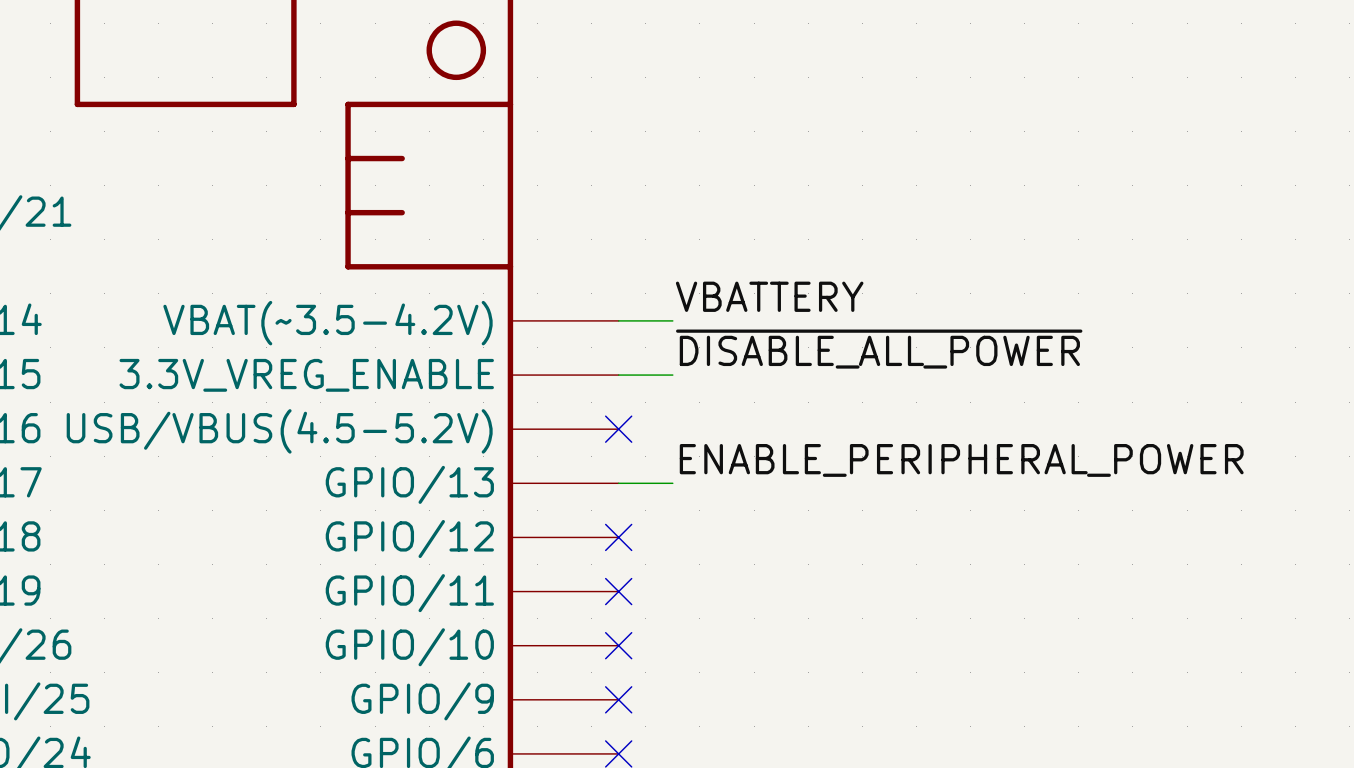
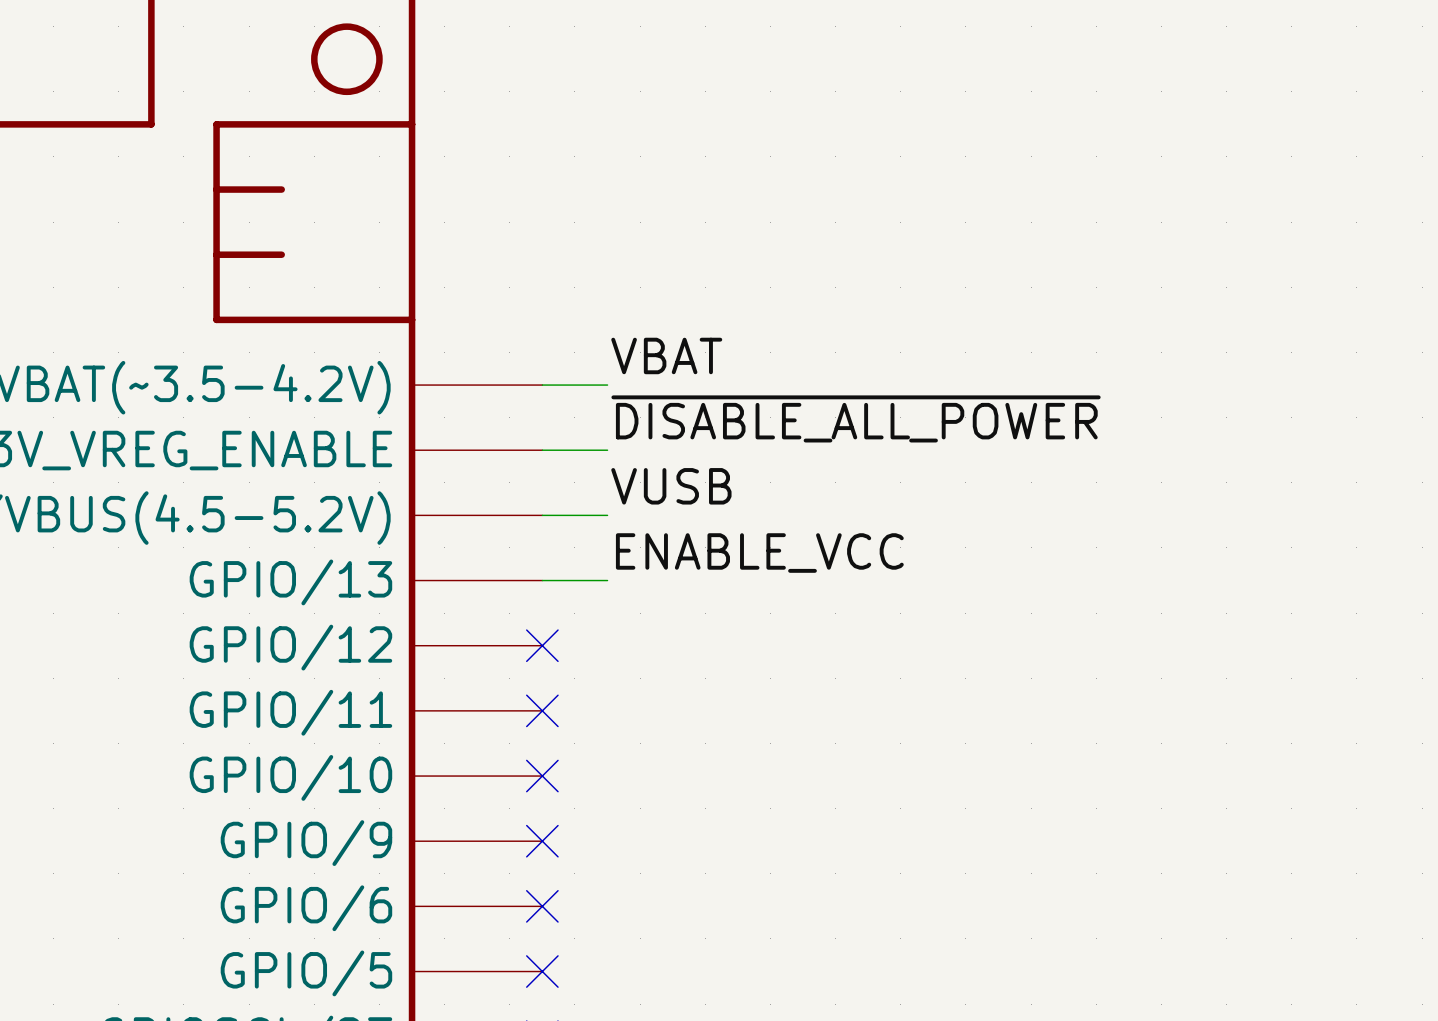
label: VBATTERY (769, 296) -> VBAT (666, 355)
label: none -> VUSB (671, 486)
wire: none -> (542, 515) (607, 515)
no-connect mark: (618, 429) -> none
label: ENABLE_PERIPHERAL_POWER (961, 460) -> ENABLE_VCC (759, 553)

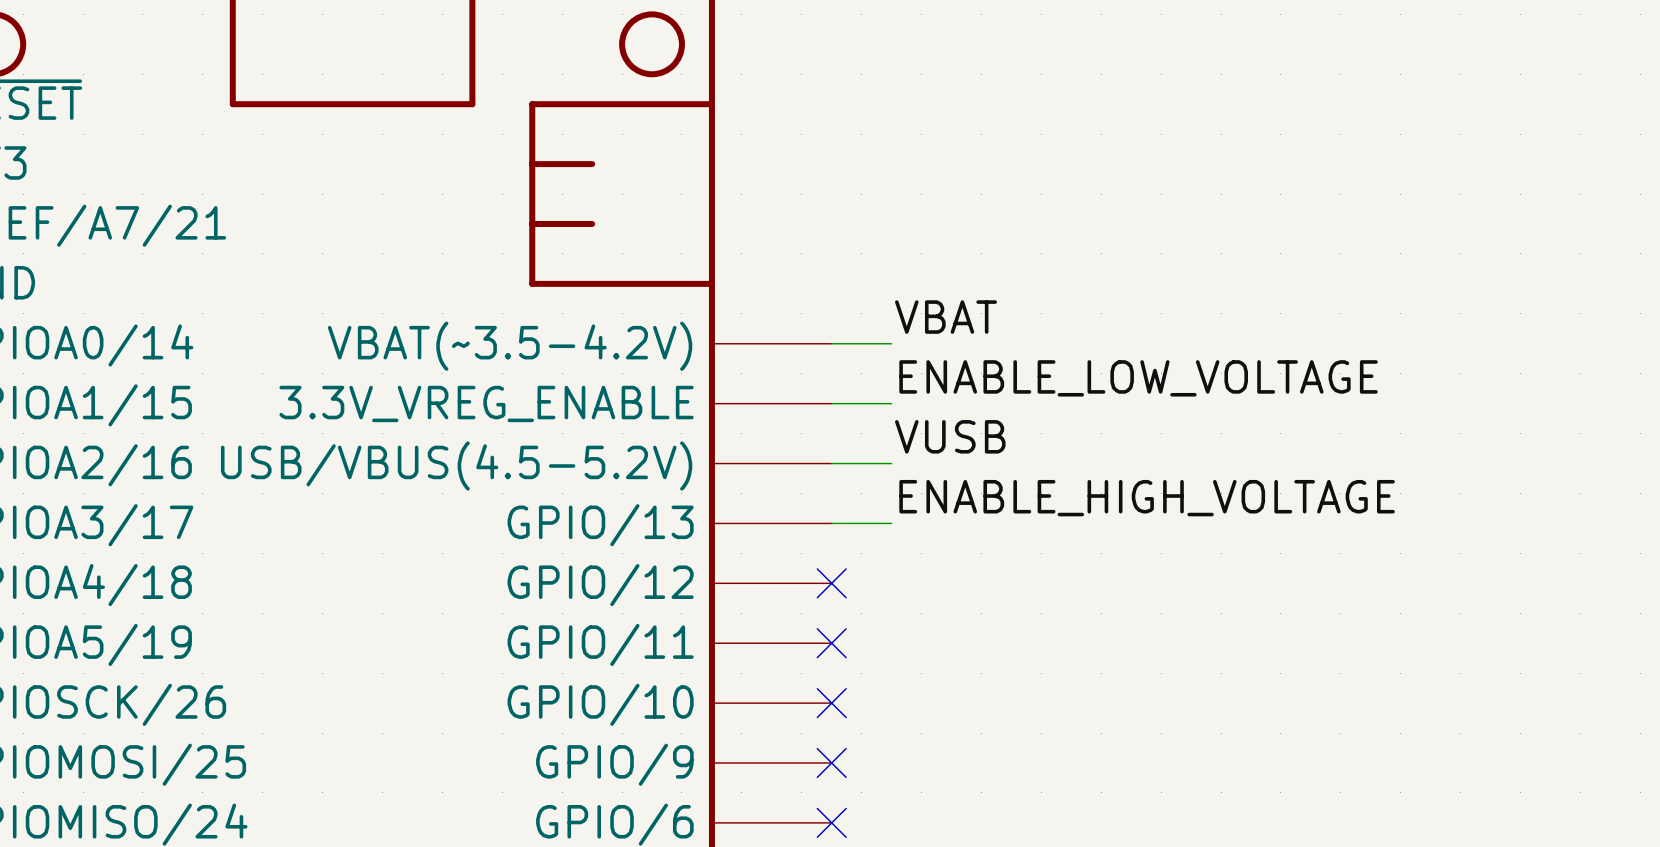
label: ~{DISABLE_ALL_POWER} (856, 418) -> ENABLE_LOW_VOLTAGE (1138, 378)
label: ENABLE_VCC (759, 553) -> ENABLE_HIGH_VOLTAGE (1147, 498)

